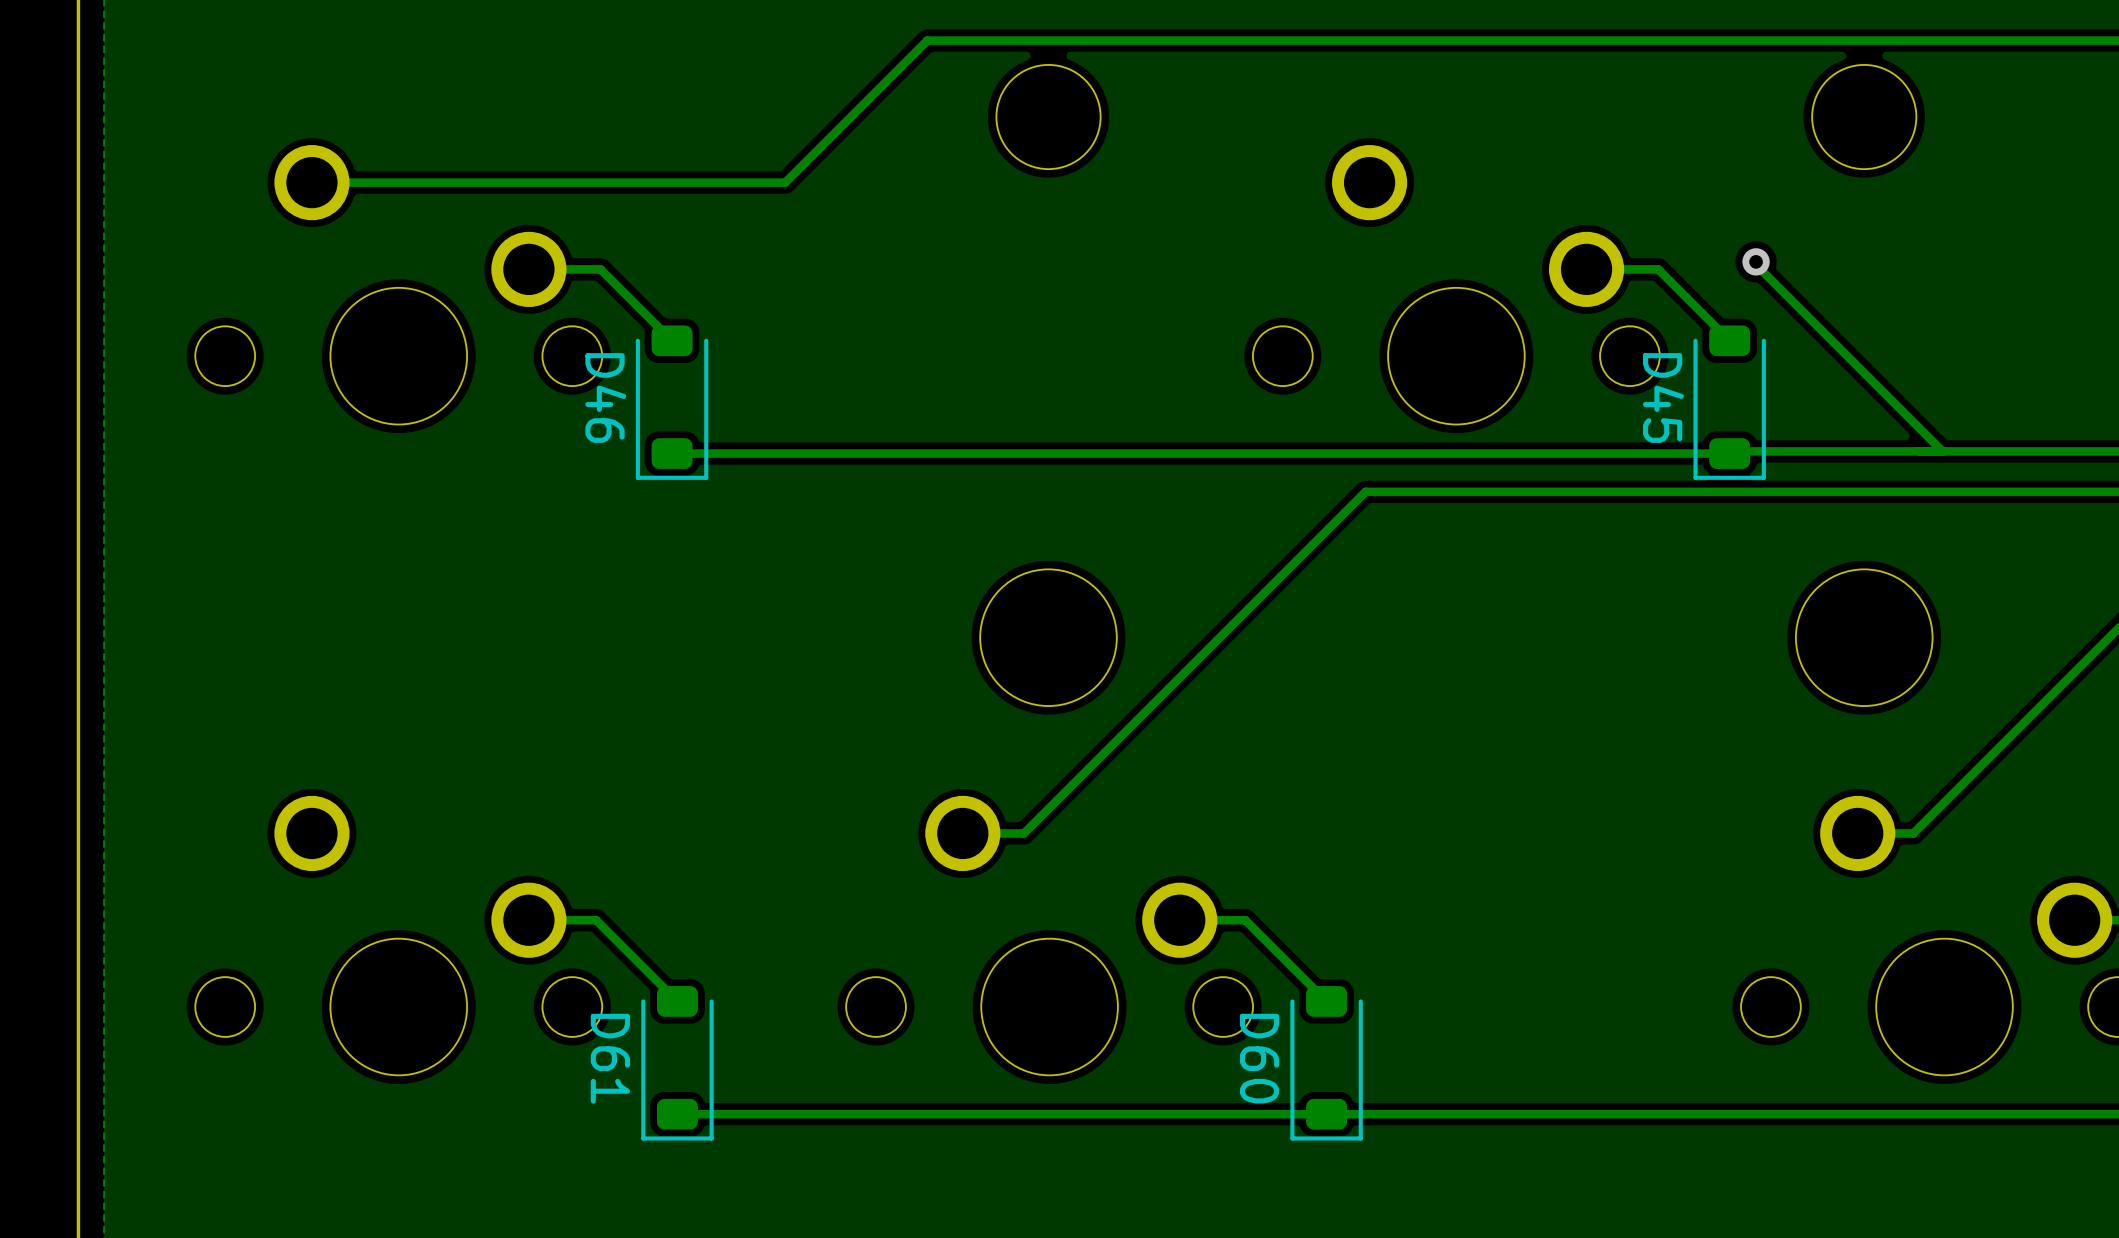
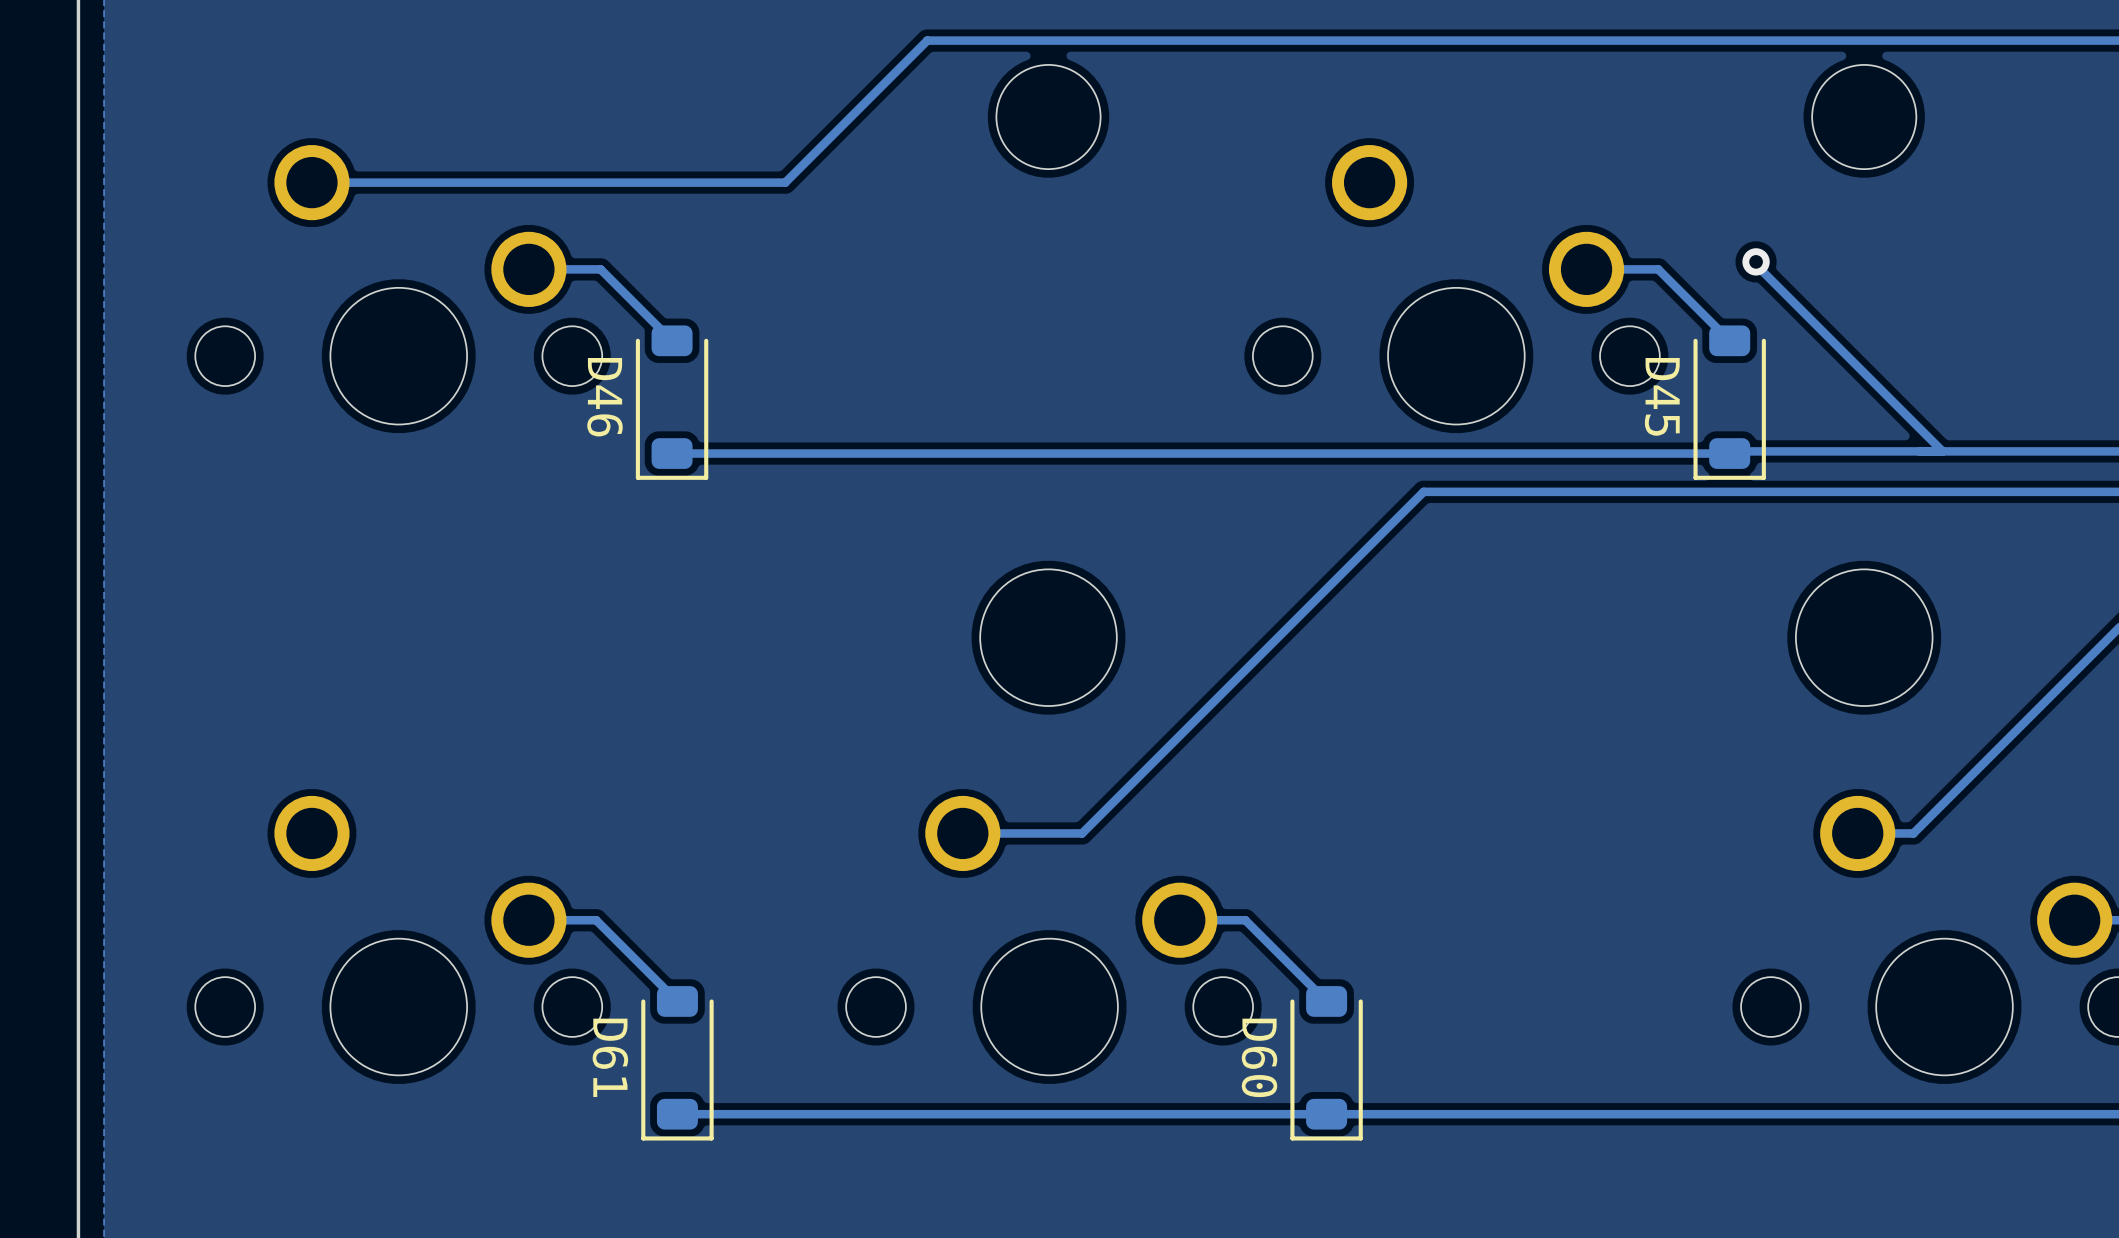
track: (1423, 491) (1365, 491) (1023, 833) -> (1423, 491) (1082, 833) (1023, 833)

